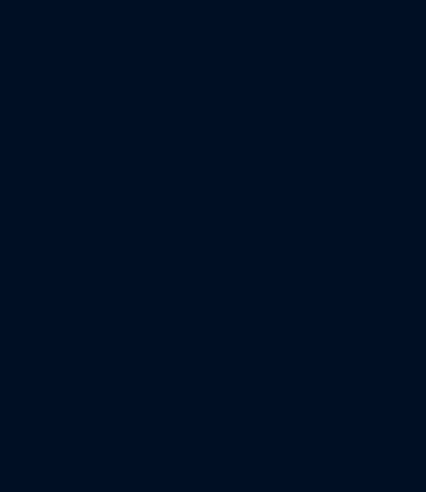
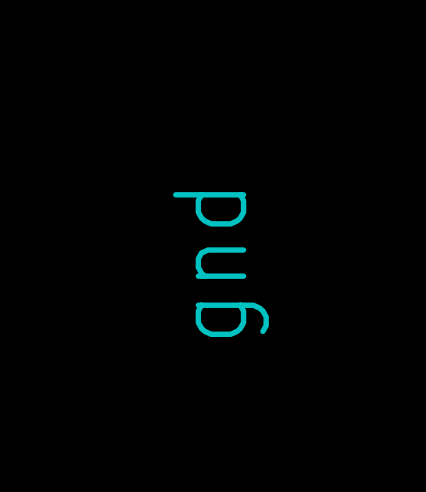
text: none -> gnd (220, 264)

